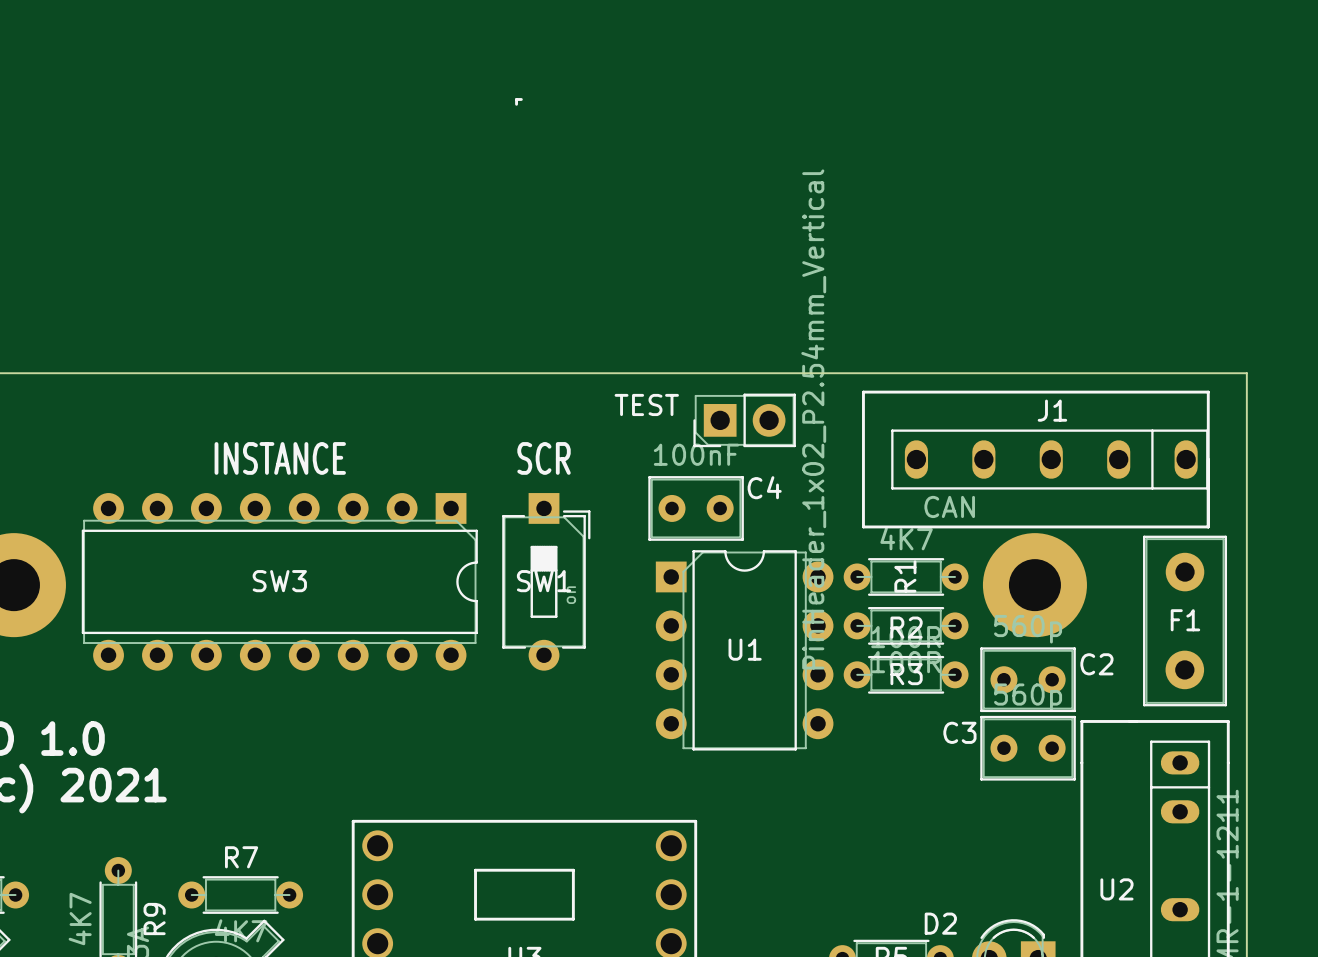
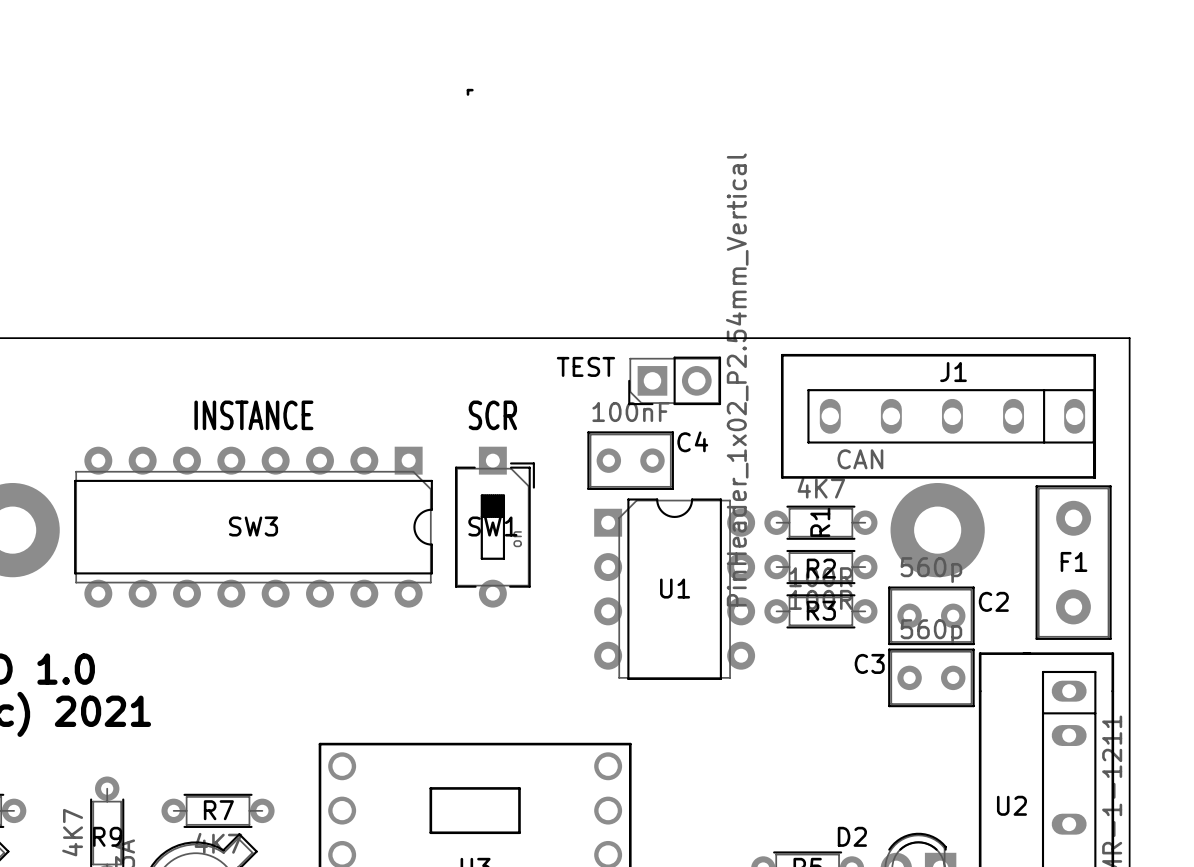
R7 name position: R7 (241, 857) -> R7 (218, 810)
R9 name rotation: 0° (154, 919) -> 90° clockwise (107, 836)

